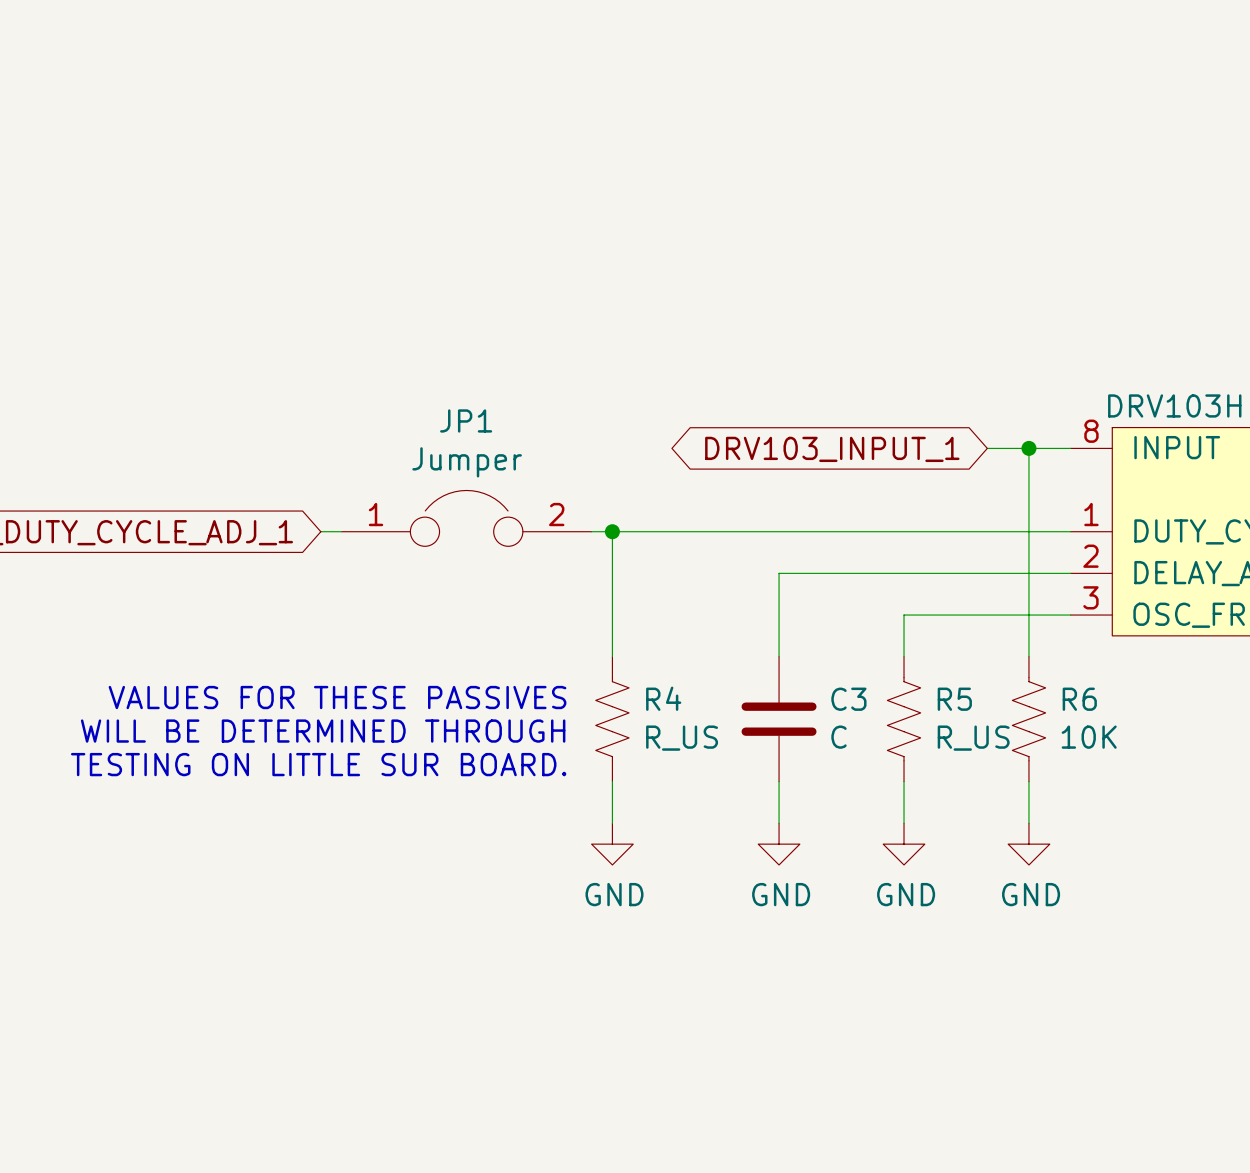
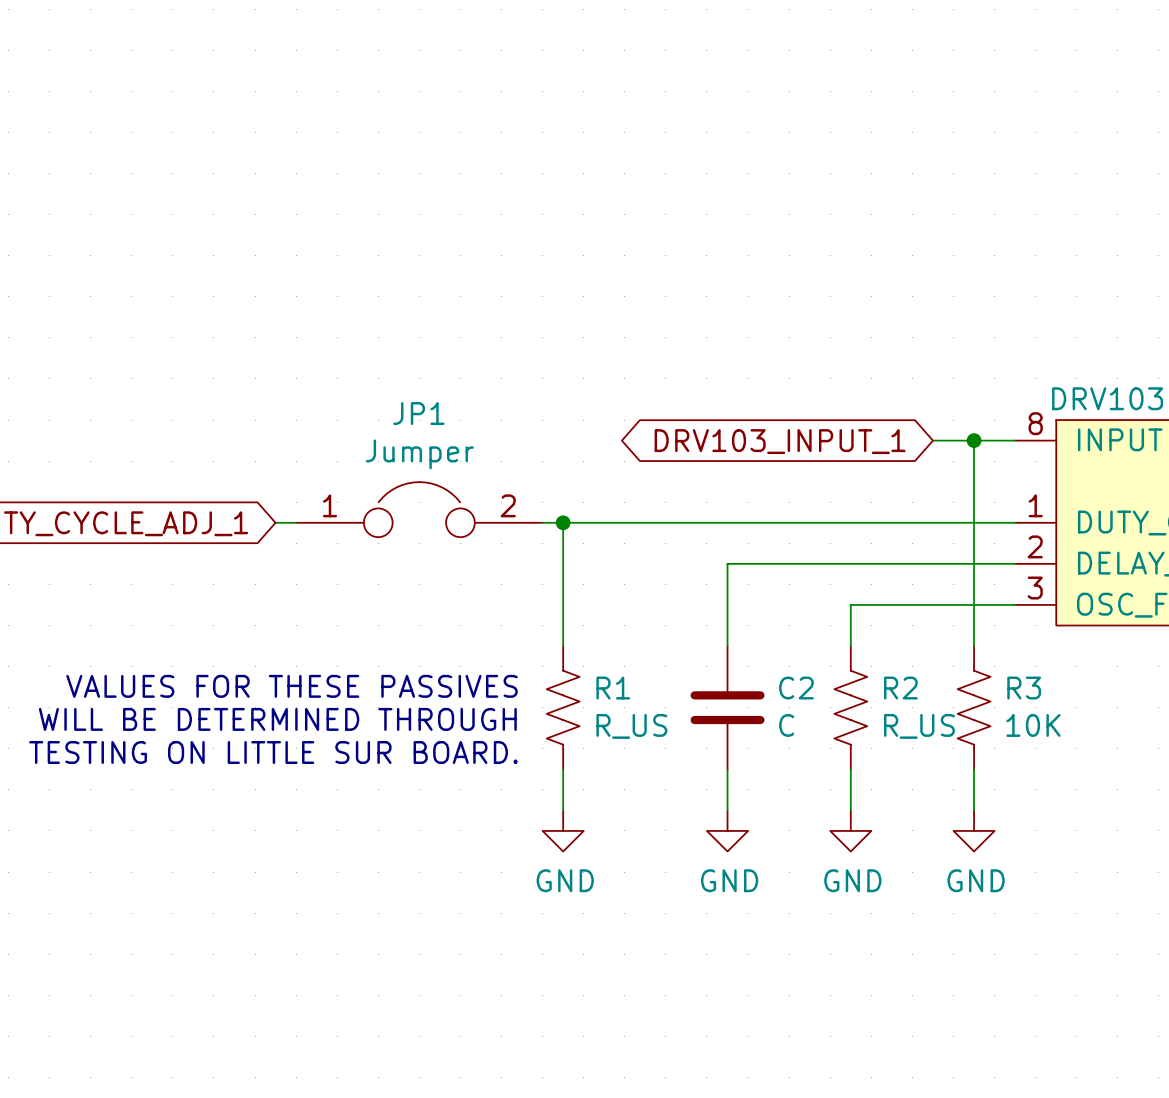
R4 name: R4 (663, 698) -> R1 (613, 688)
C3 name: C3 (848, 699) -> C2 (796, 688)
R5 name: R5 (954, 699) -> R2 (900, 688)
R6 name: R6 (1079, 699) -> R3 (1024, 688)

